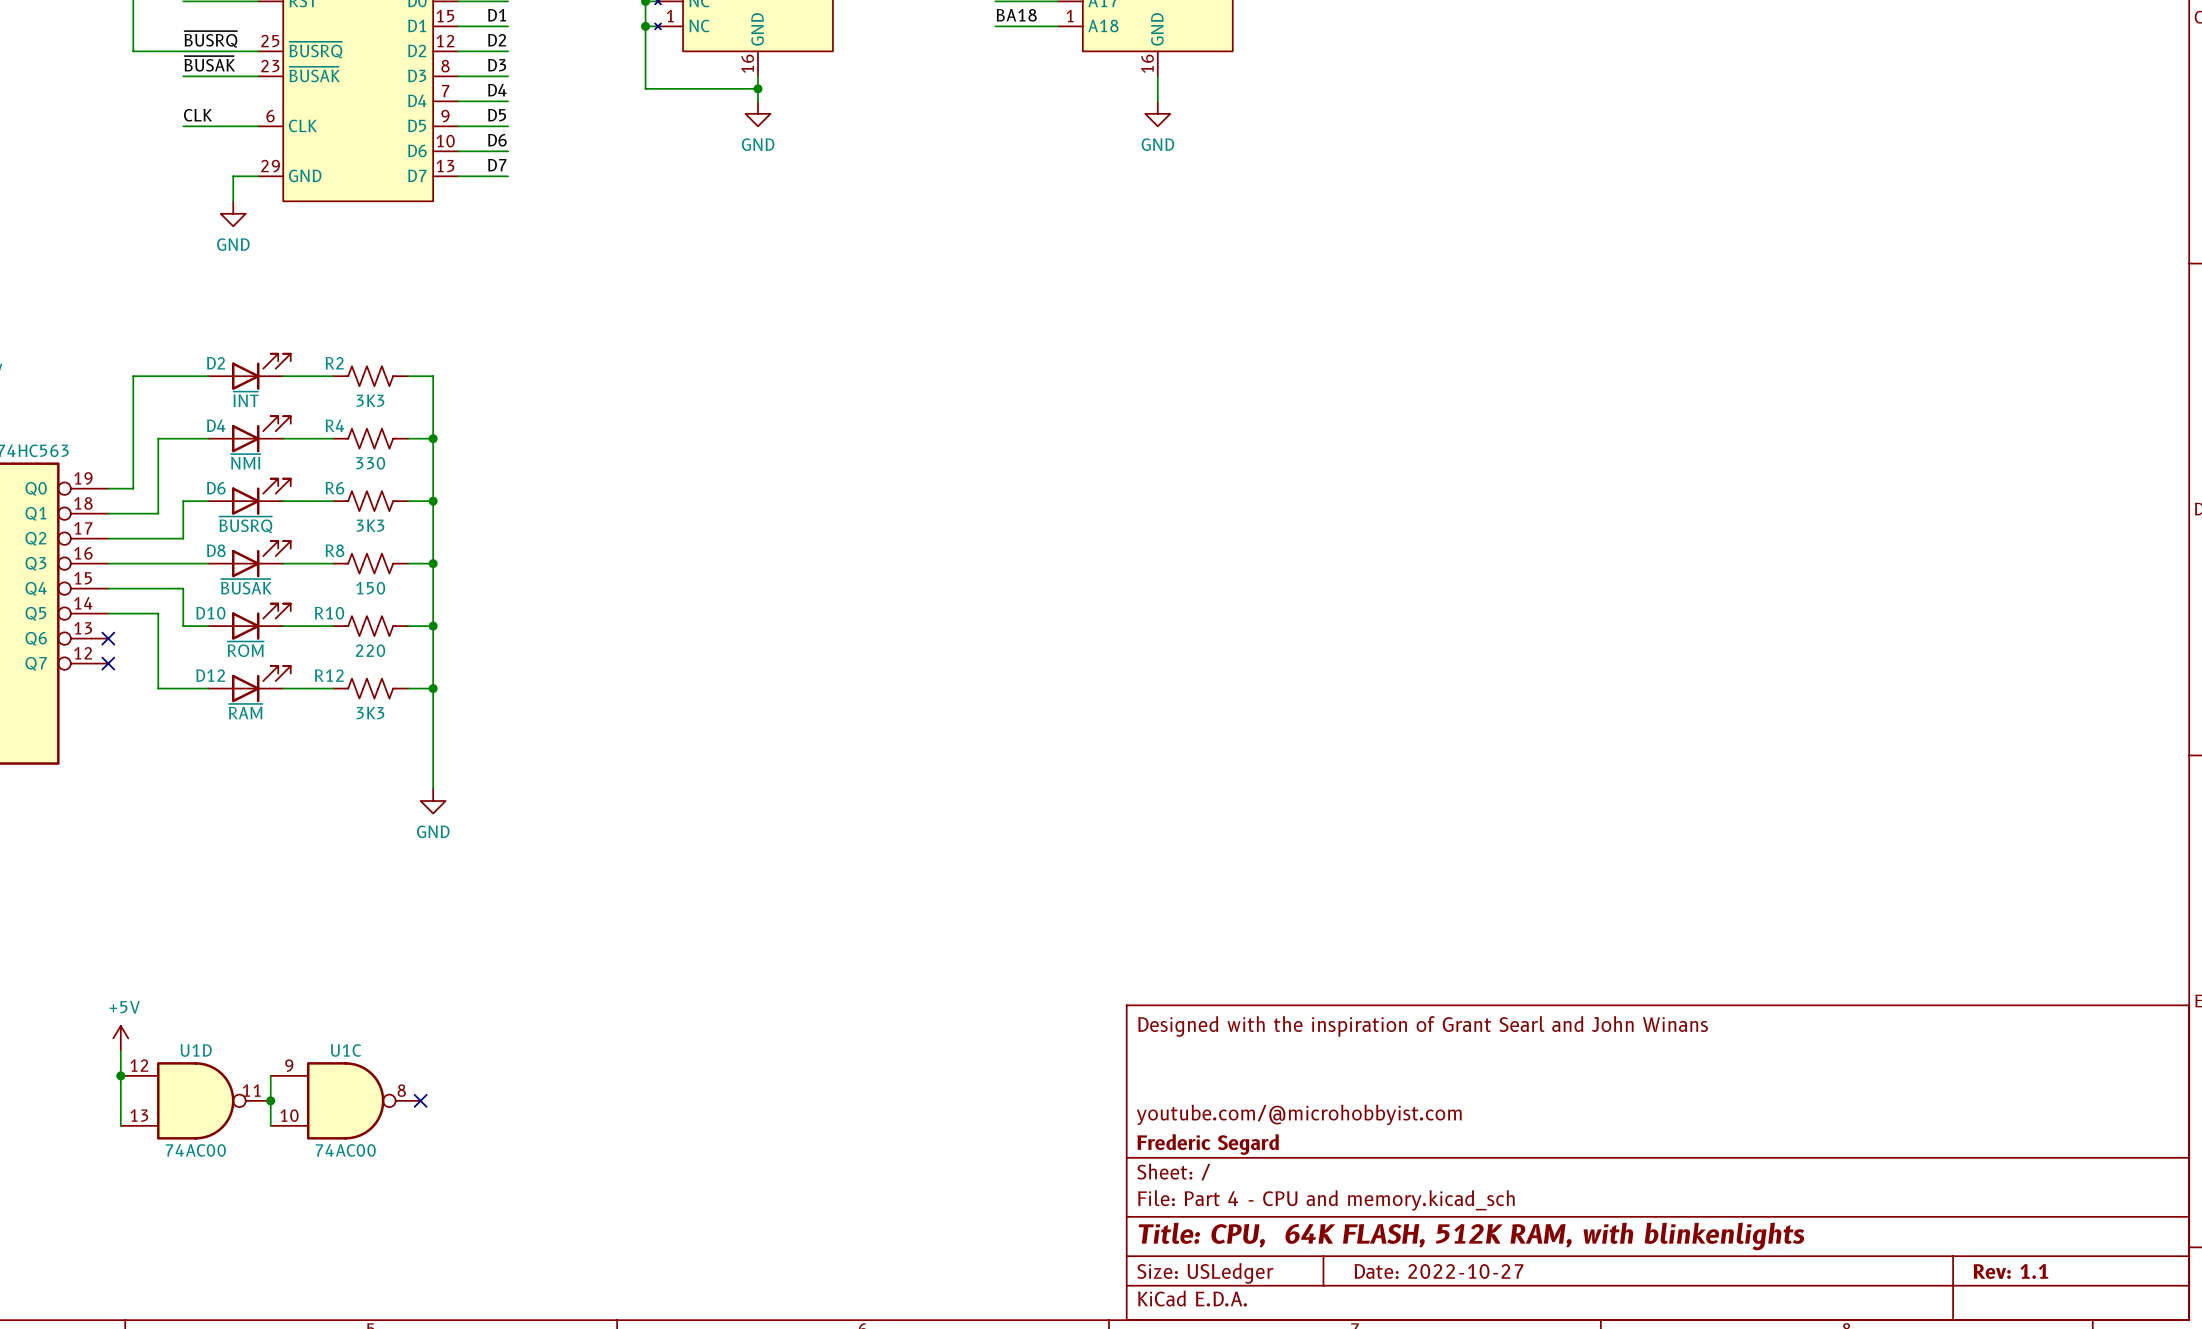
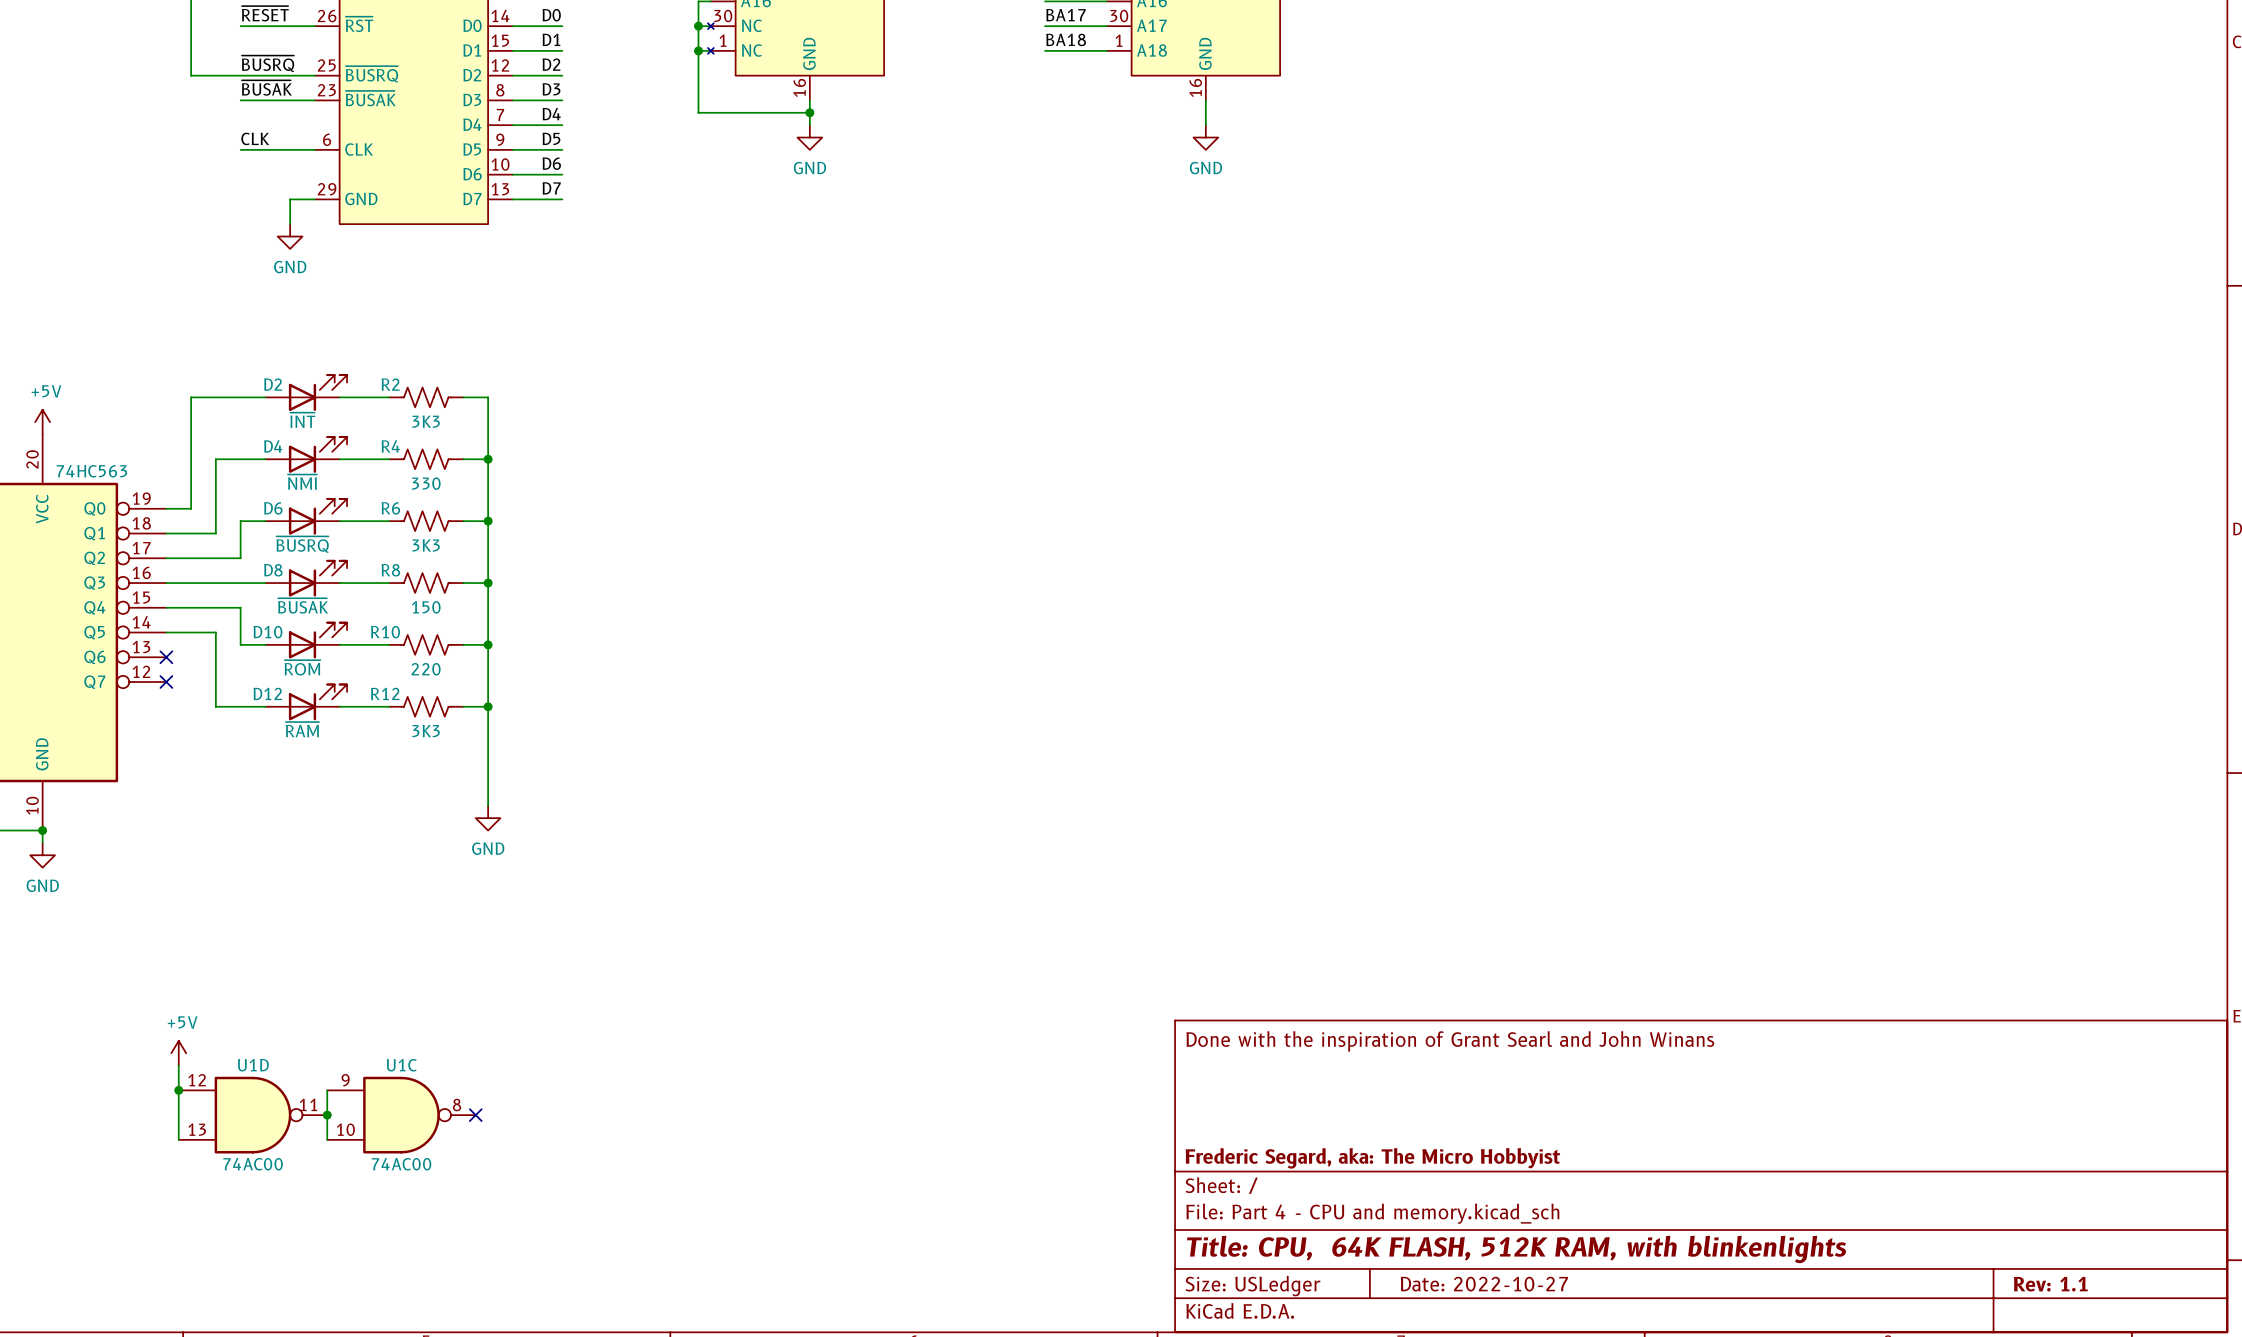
title block: Designed with the inspiration of Grant Searl and John Winans (1423, 1026) -> Done with the inspiration of Grant Searl and John Winans (1450, 1041)
title block: youtube.com/@microhobbyist.com (1299, 1114) -> none
title block: Frederic Segard (1208, 1144) -> Frederic Segard, aka: The Micro Hobbyist (1372, 1158)

